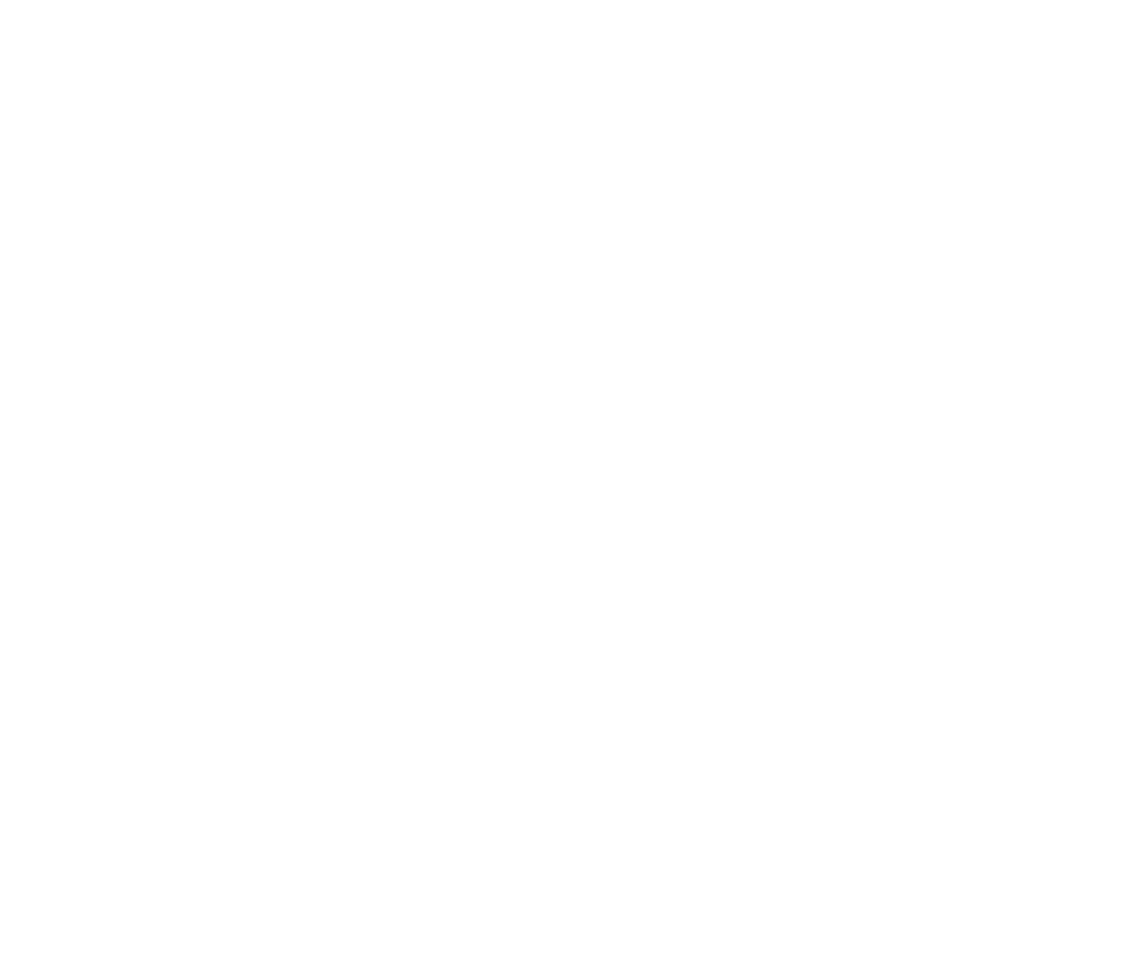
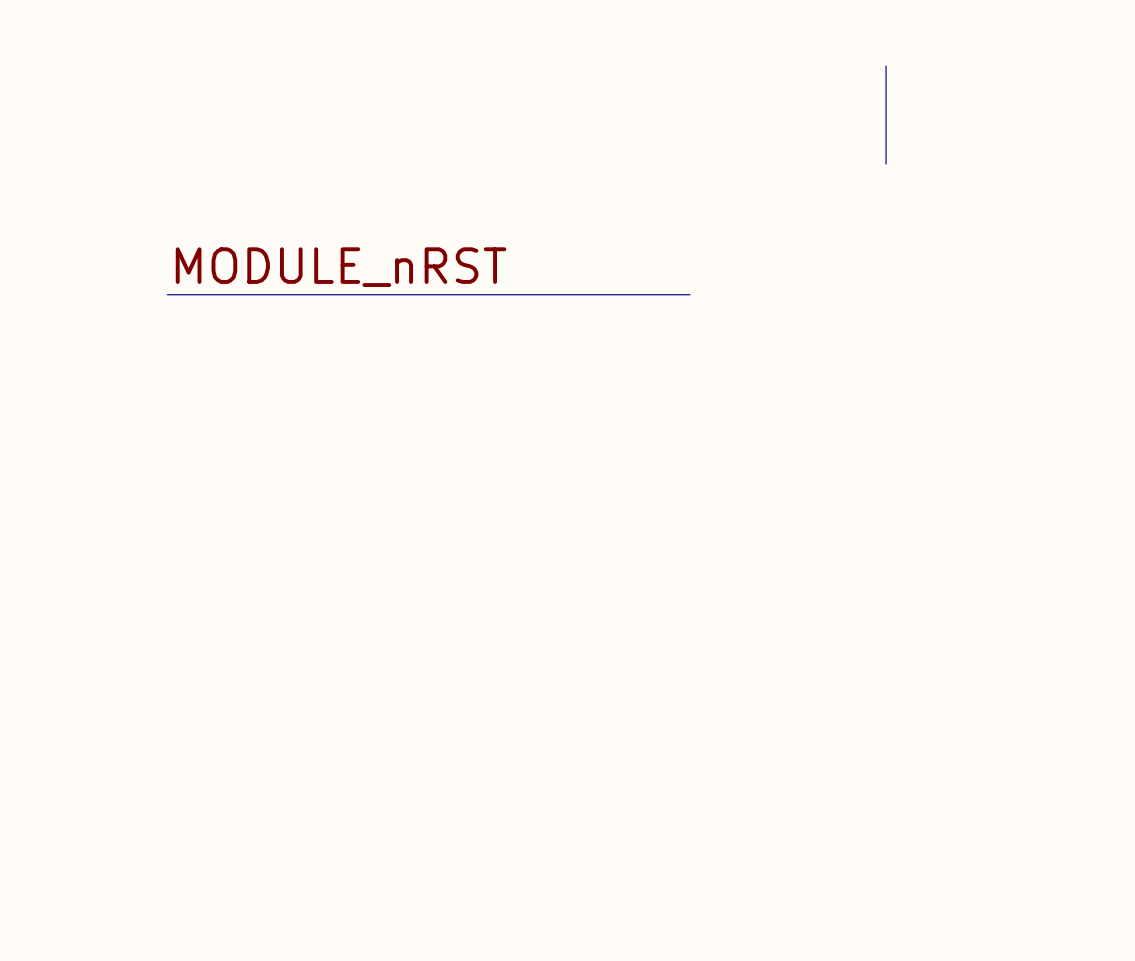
wire: none -> (886, 66) (886, 164)
label: none -> MODULE_nRST (341, 267)
wire: none -> (167, 294) (690, 294)

